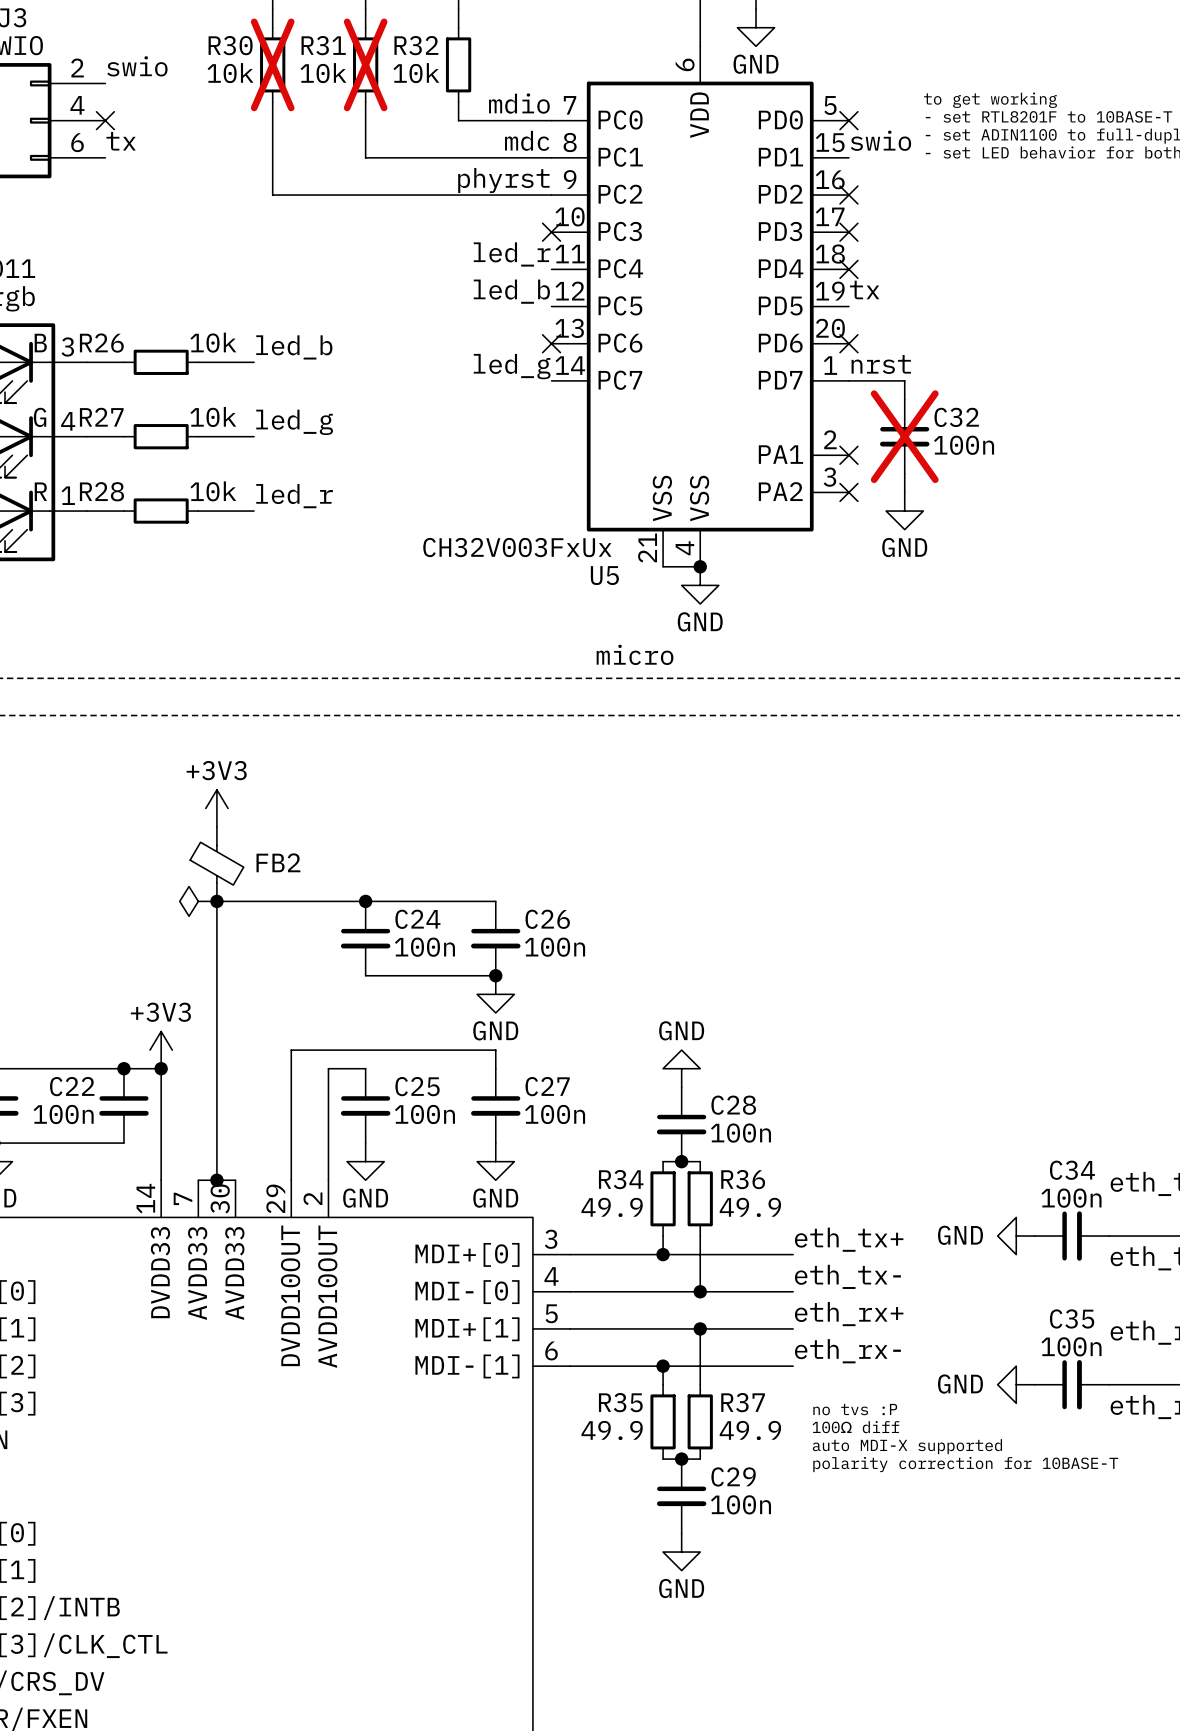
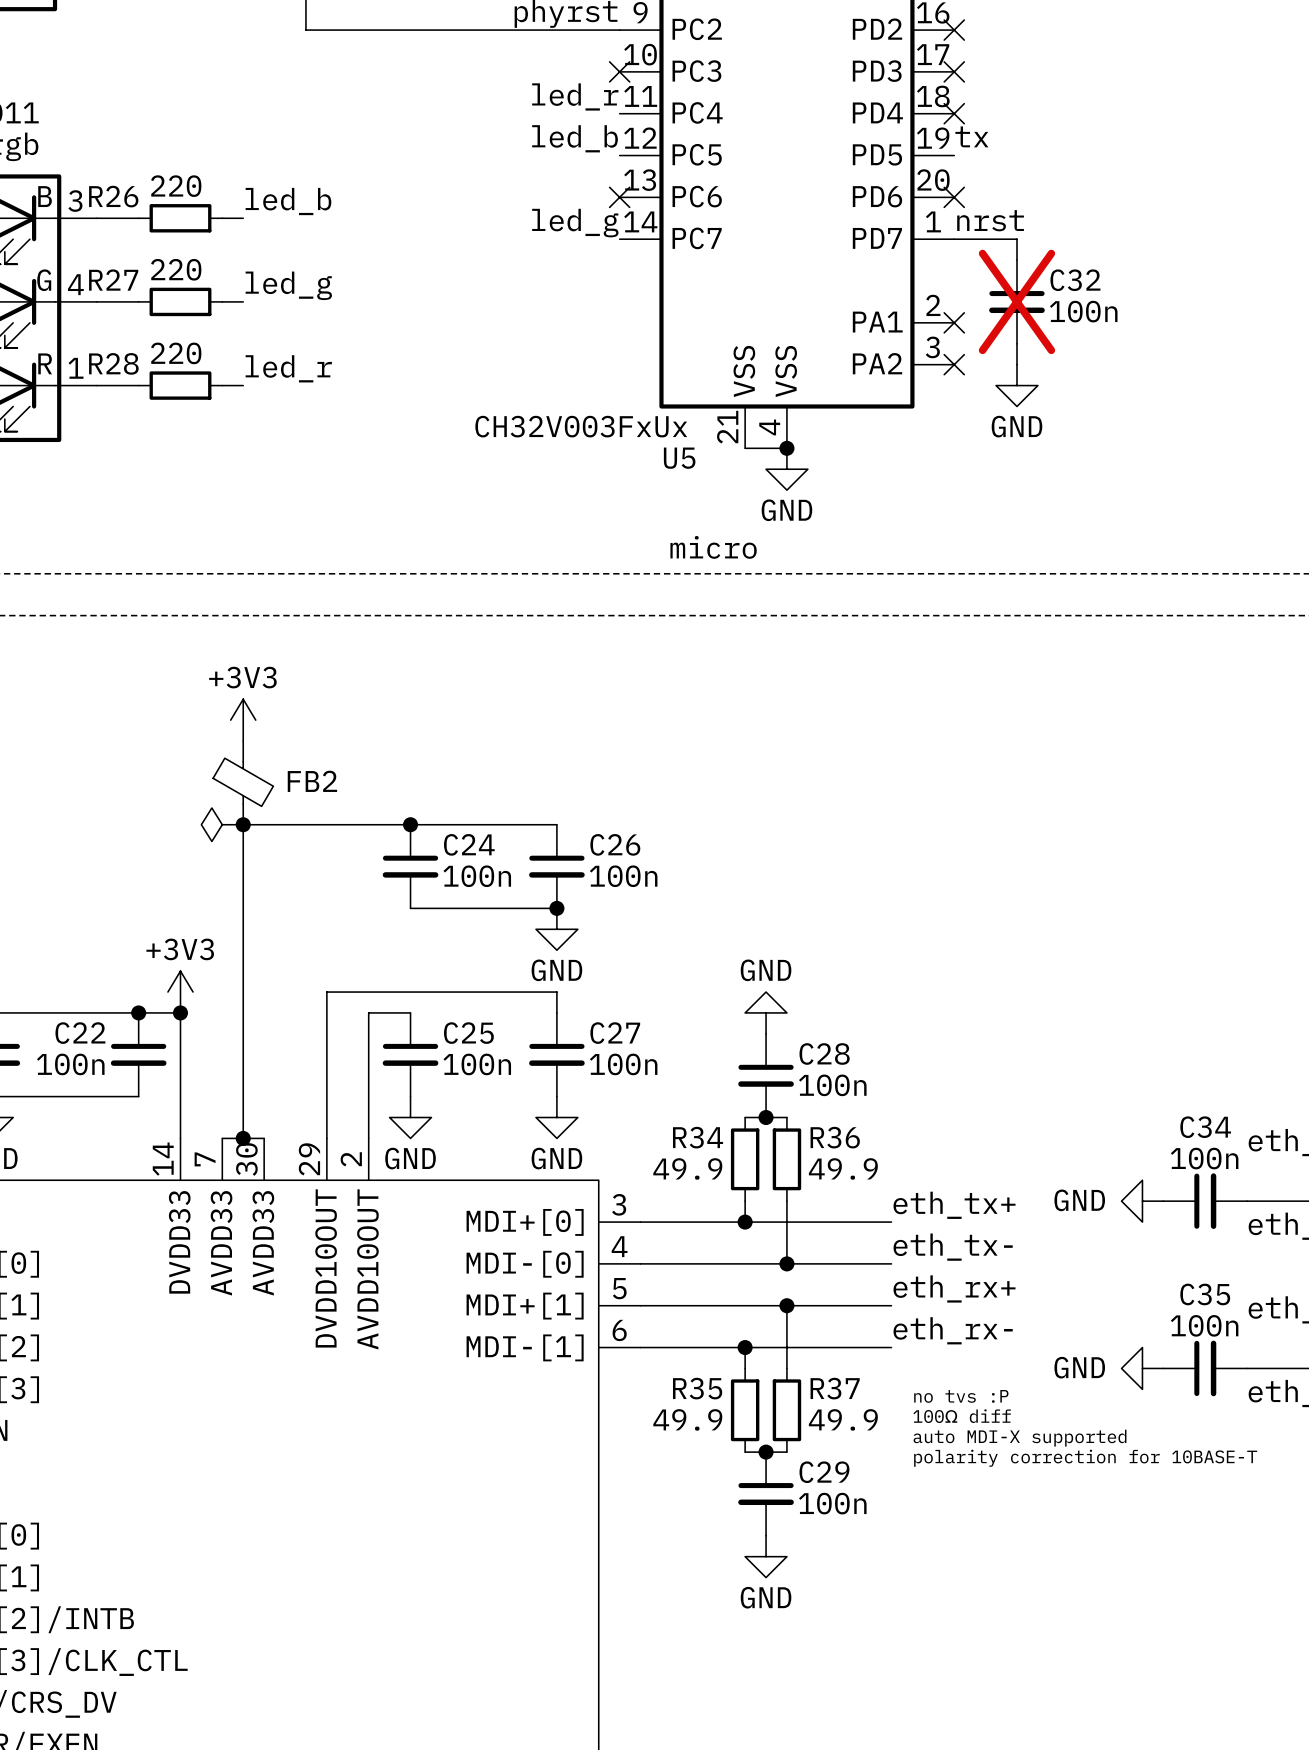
R26 value: 10k (213, 342) -> 220 (176, 186)
label position: led_b (294, 347) -> led_b (288, 201)
wire: (216, 362) (254, 362) -> none
R27 value: 10k (213, 416) -> 220 (176, 269)
label position: led_g (294, 422) -> led_g (288, 285)
wire: (216, 436) (254, 436) -> none
R28 value: 10k (213, 491) -> 220 (176, 353)
label position: led_r (294, 496) -> led_r (288, 368)
wire: (216, 511) (254, 511) -> none

